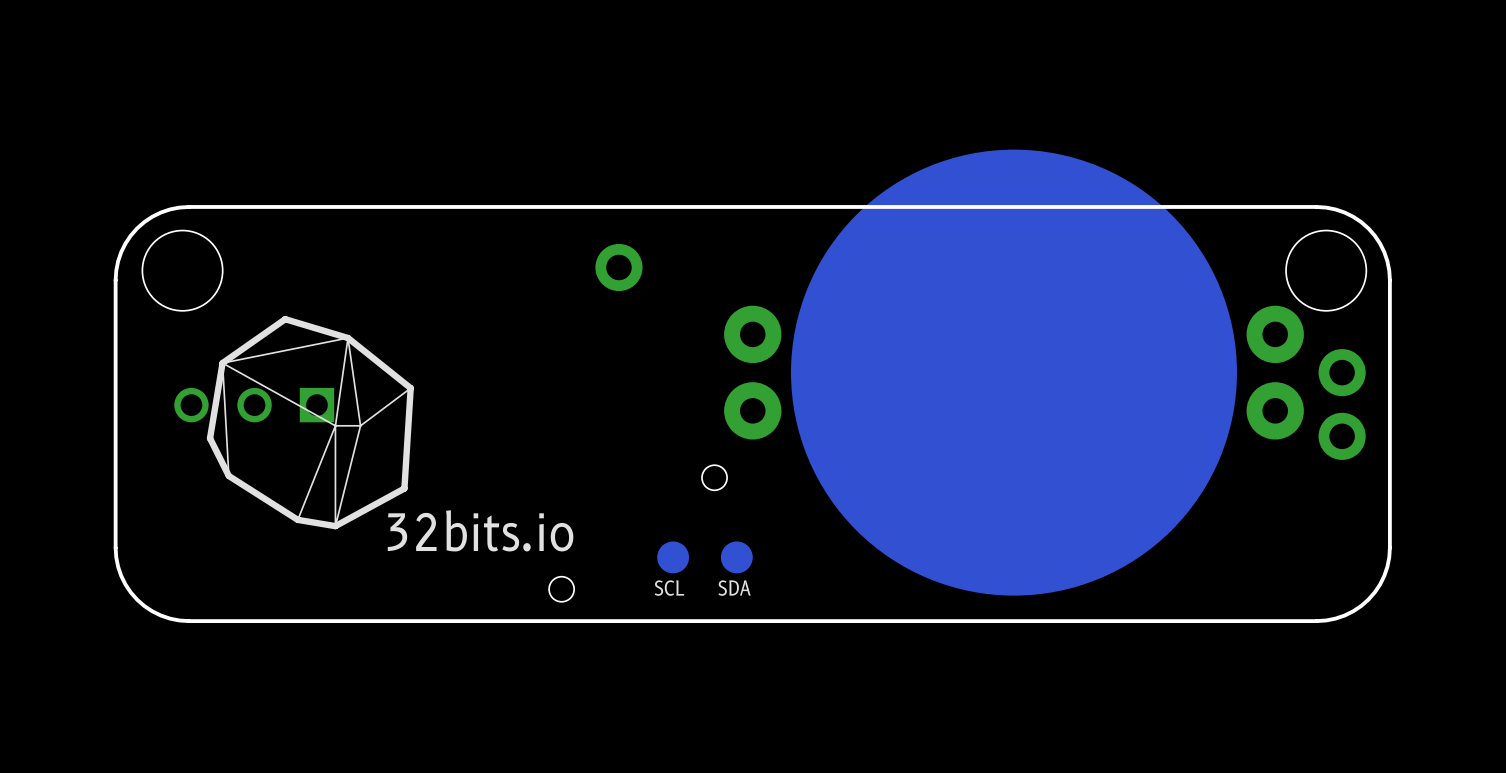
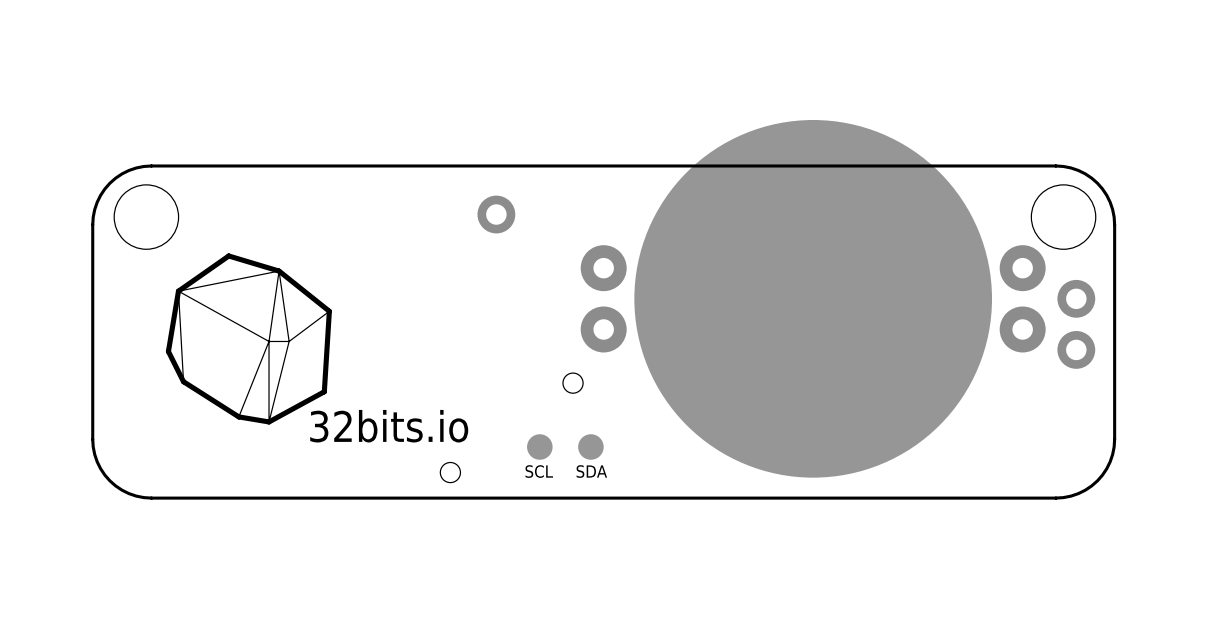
part: (254, 405) -> none

